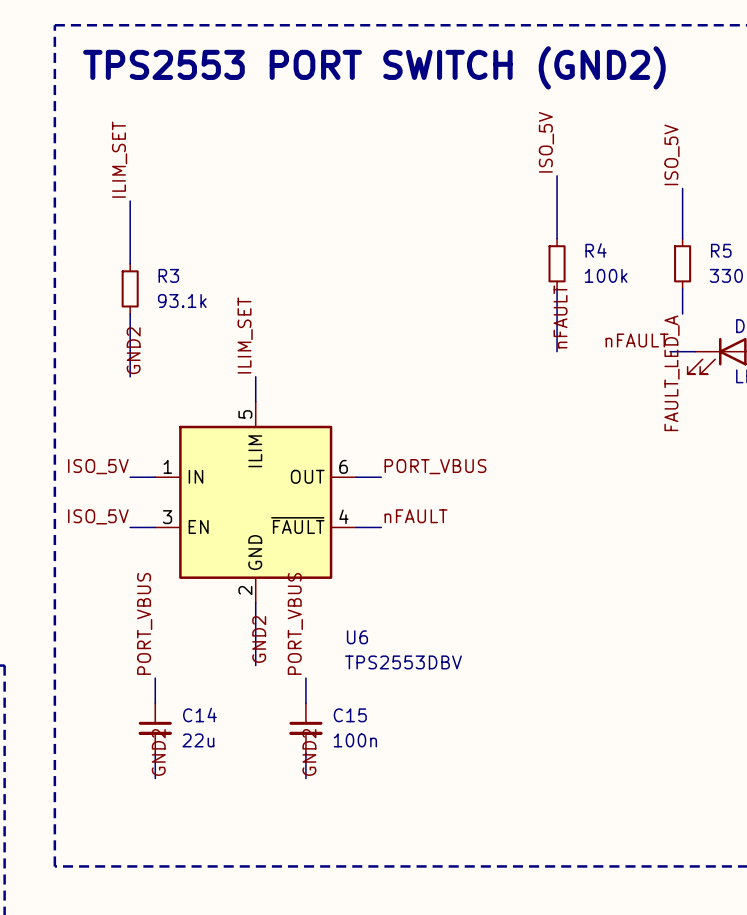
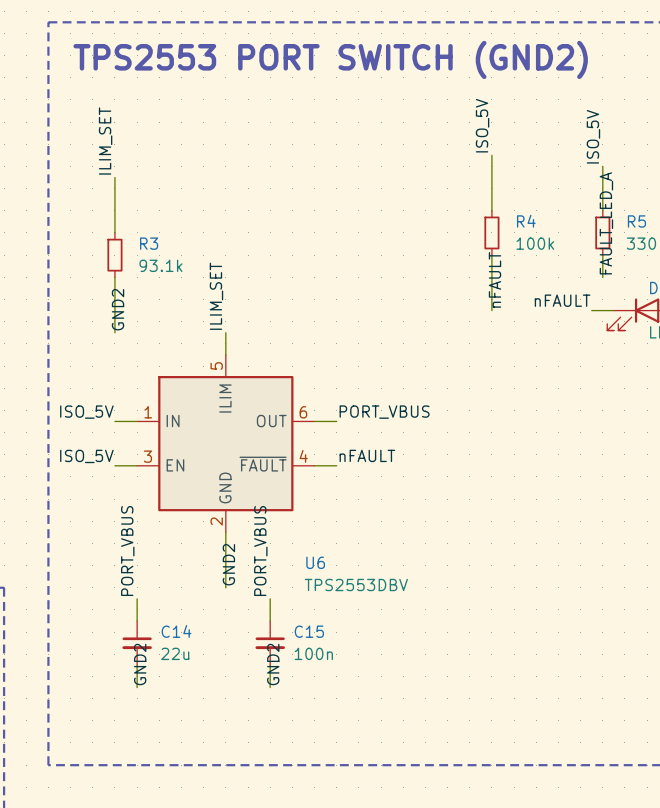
label position: FAULT_LED_A (671, 373) -> FAULT_LED_A (606, 223)

